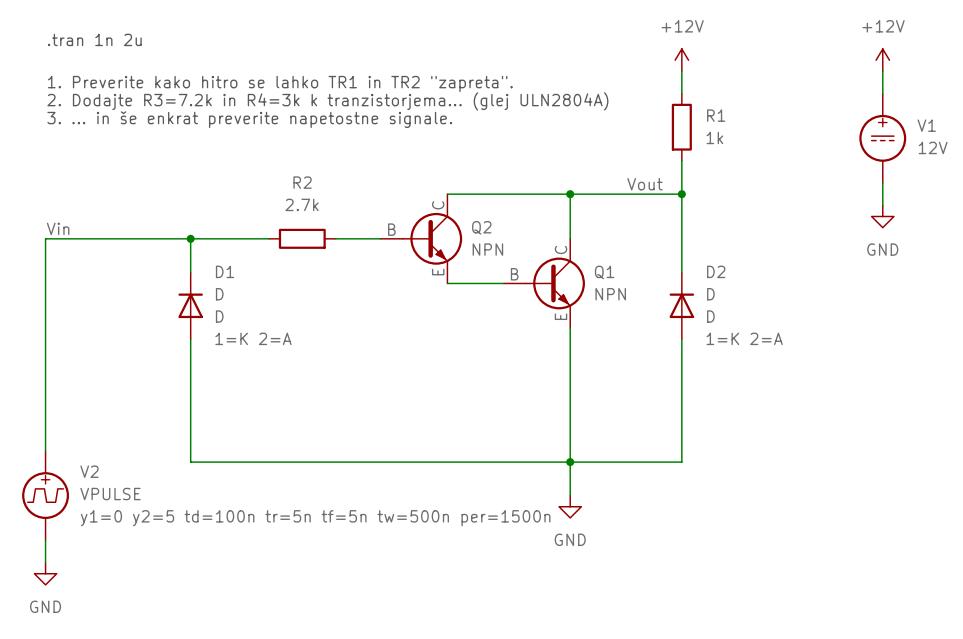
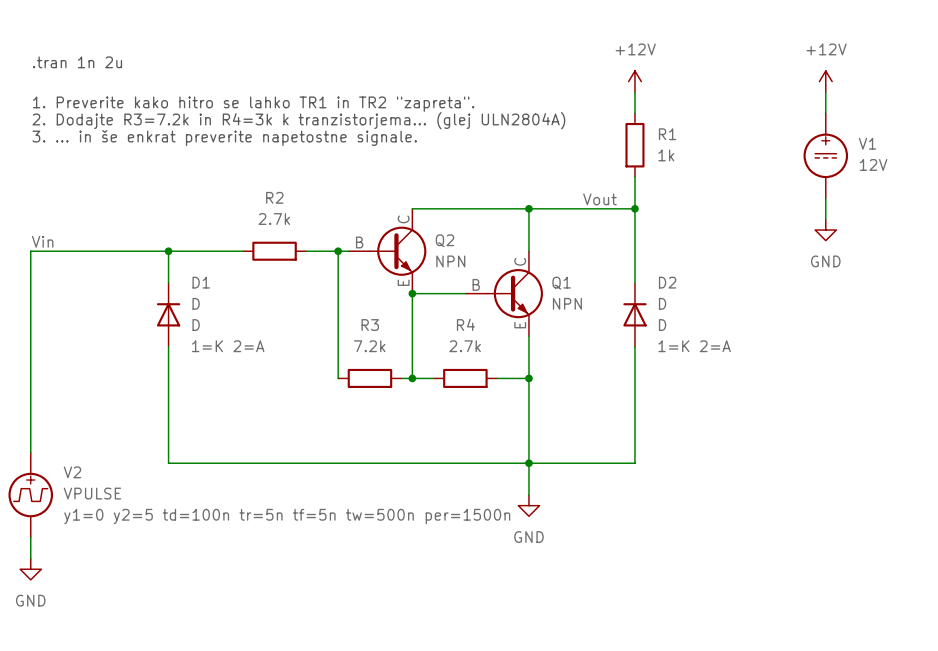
wire: none -> (338, 251) (338, 378)
junction: none -> (338, 251)
wire: none -> (412, 293) (412, 378)
junction: none -> (412, 293)
R3: none -> 7.2k (369, 378)
wire: none -> (401, 378) (433, 378)
junction: none -> (412, 378)
R4: none -> 2.7k (465, 378)
wire: none -> (497, 378) (528, 378)
junction: none -> (528, 378)

